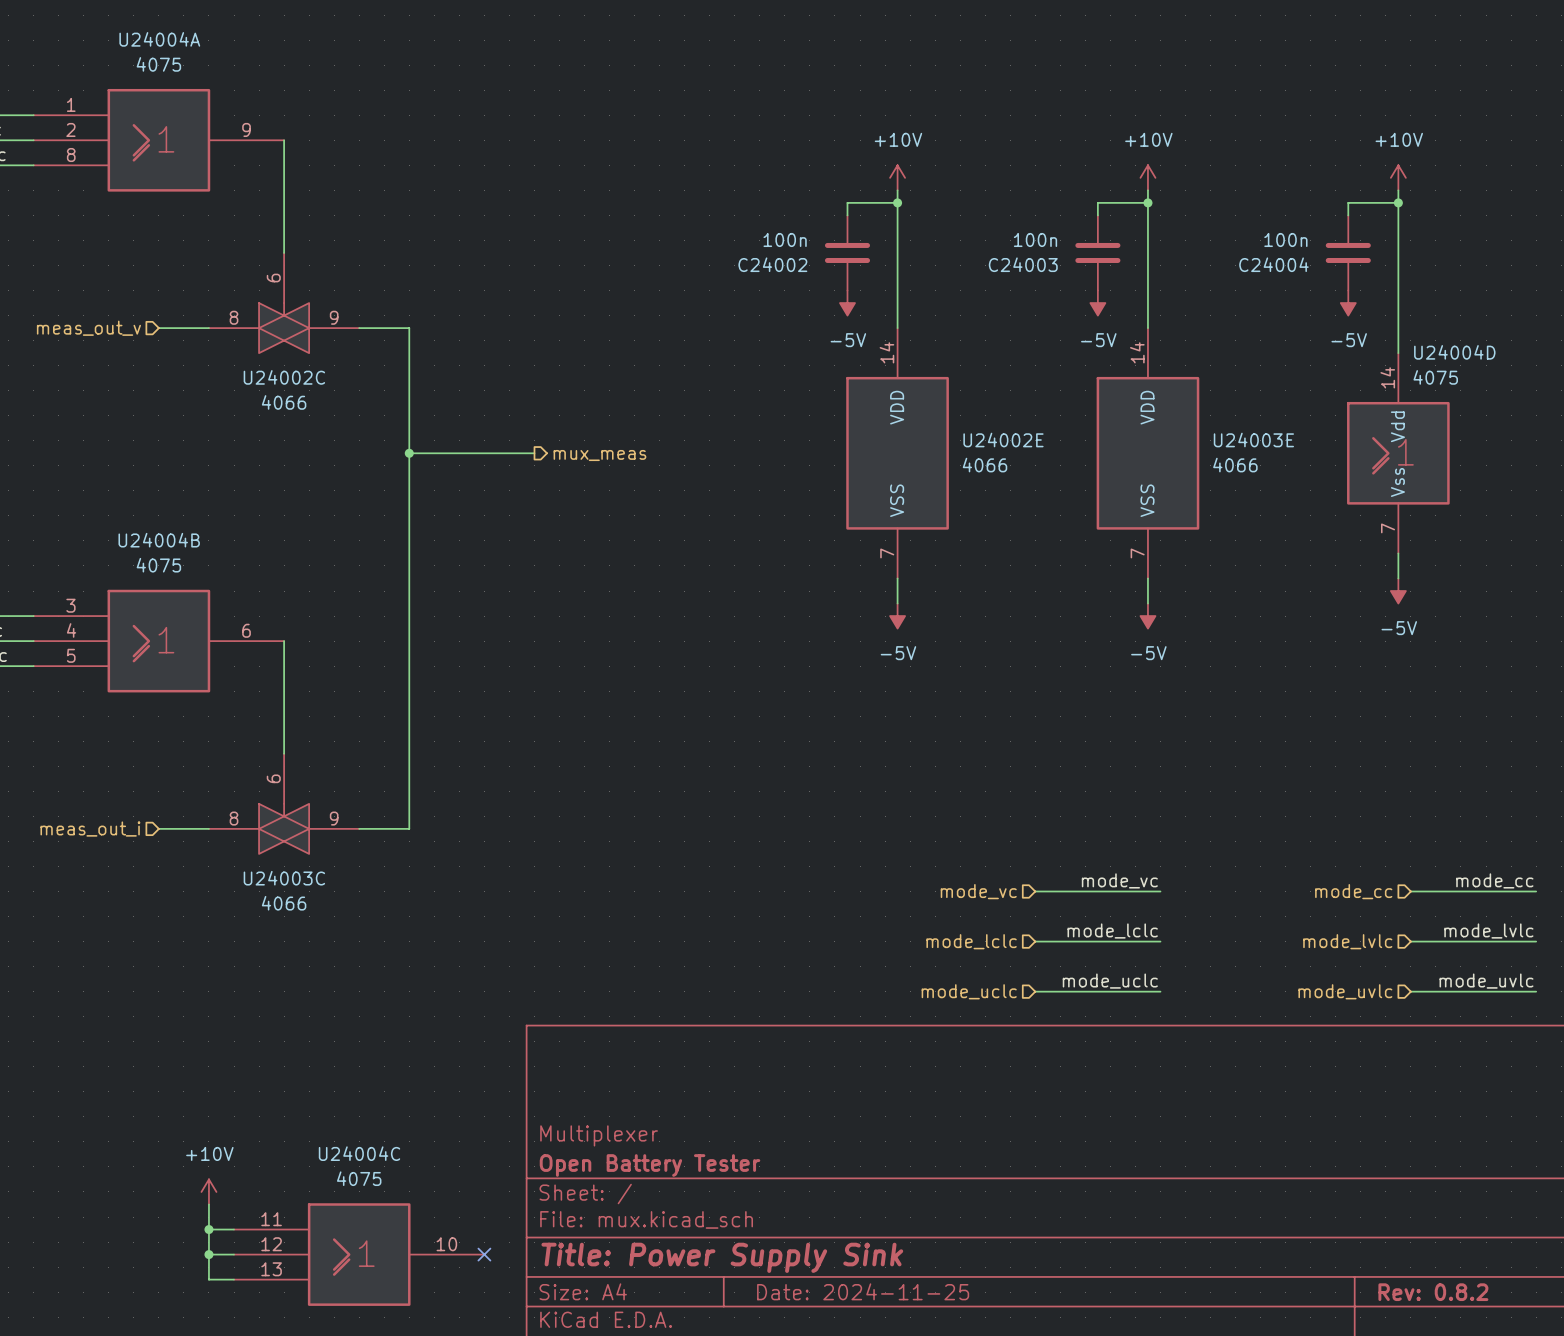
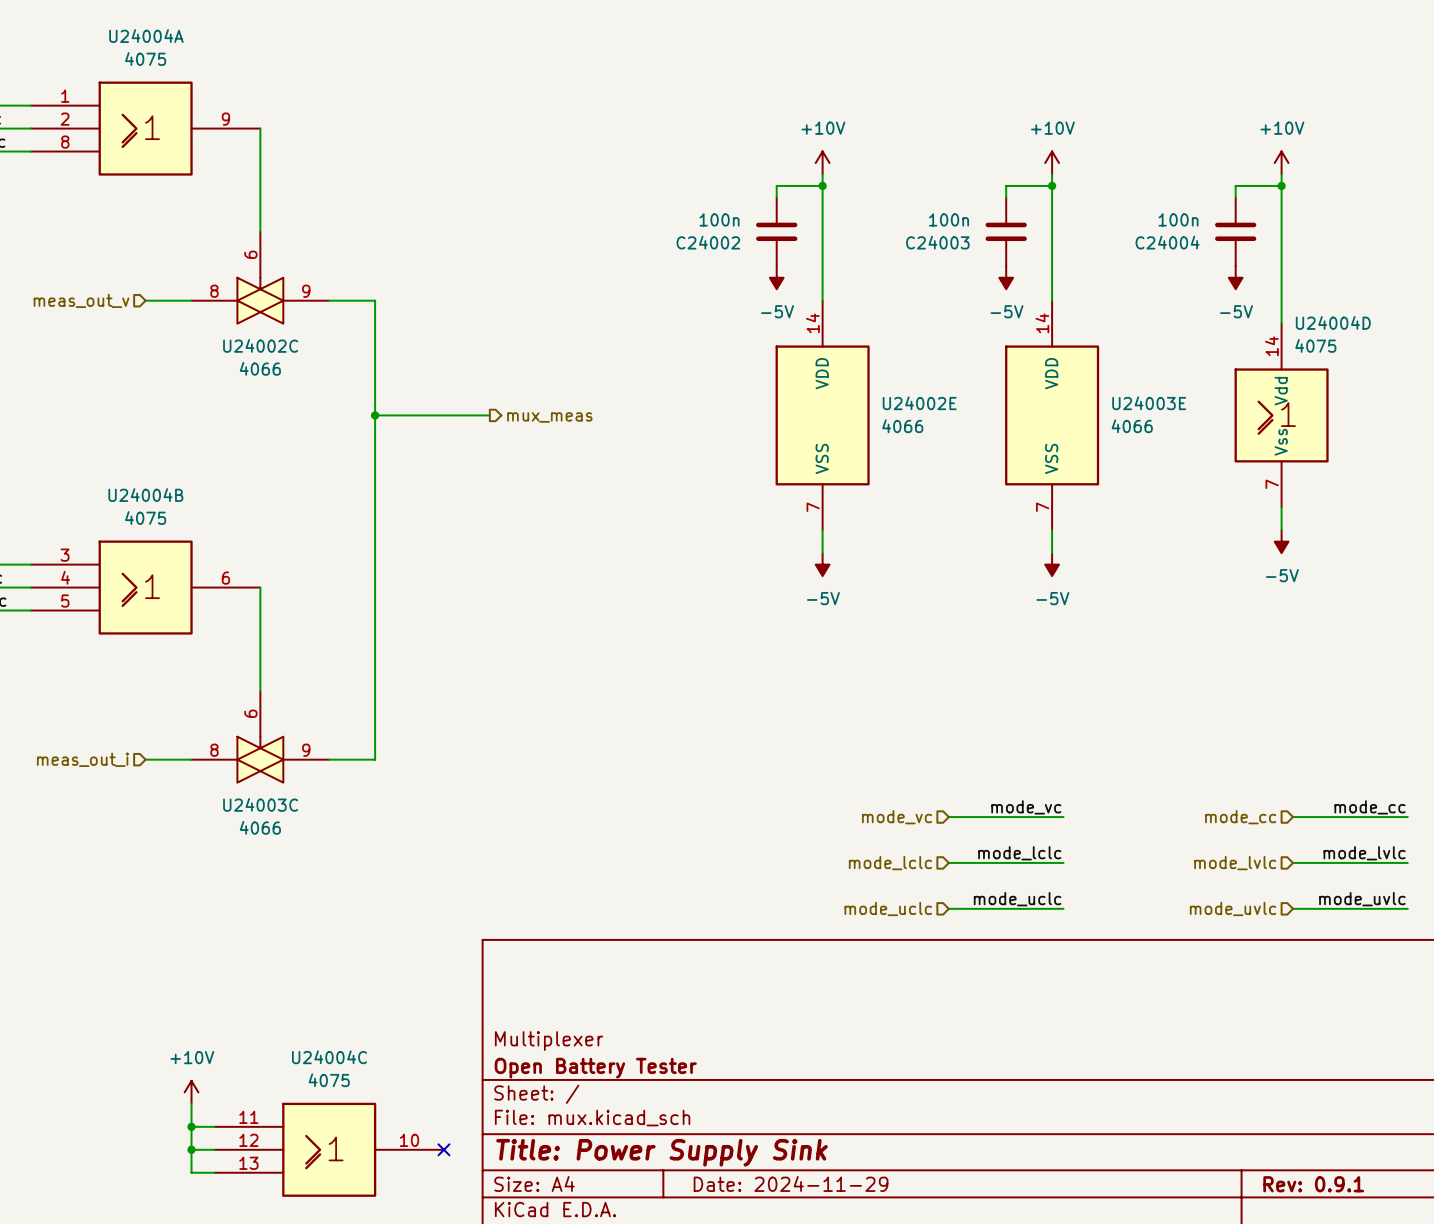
title block: Date: 2024-11-25 (863, 1291) -> Date: 2024-11-29 (791, 1183)
title block: Rev: 0.8.2 (1433, 1292) -> Rev: 0.9.1 (1313, 1184)

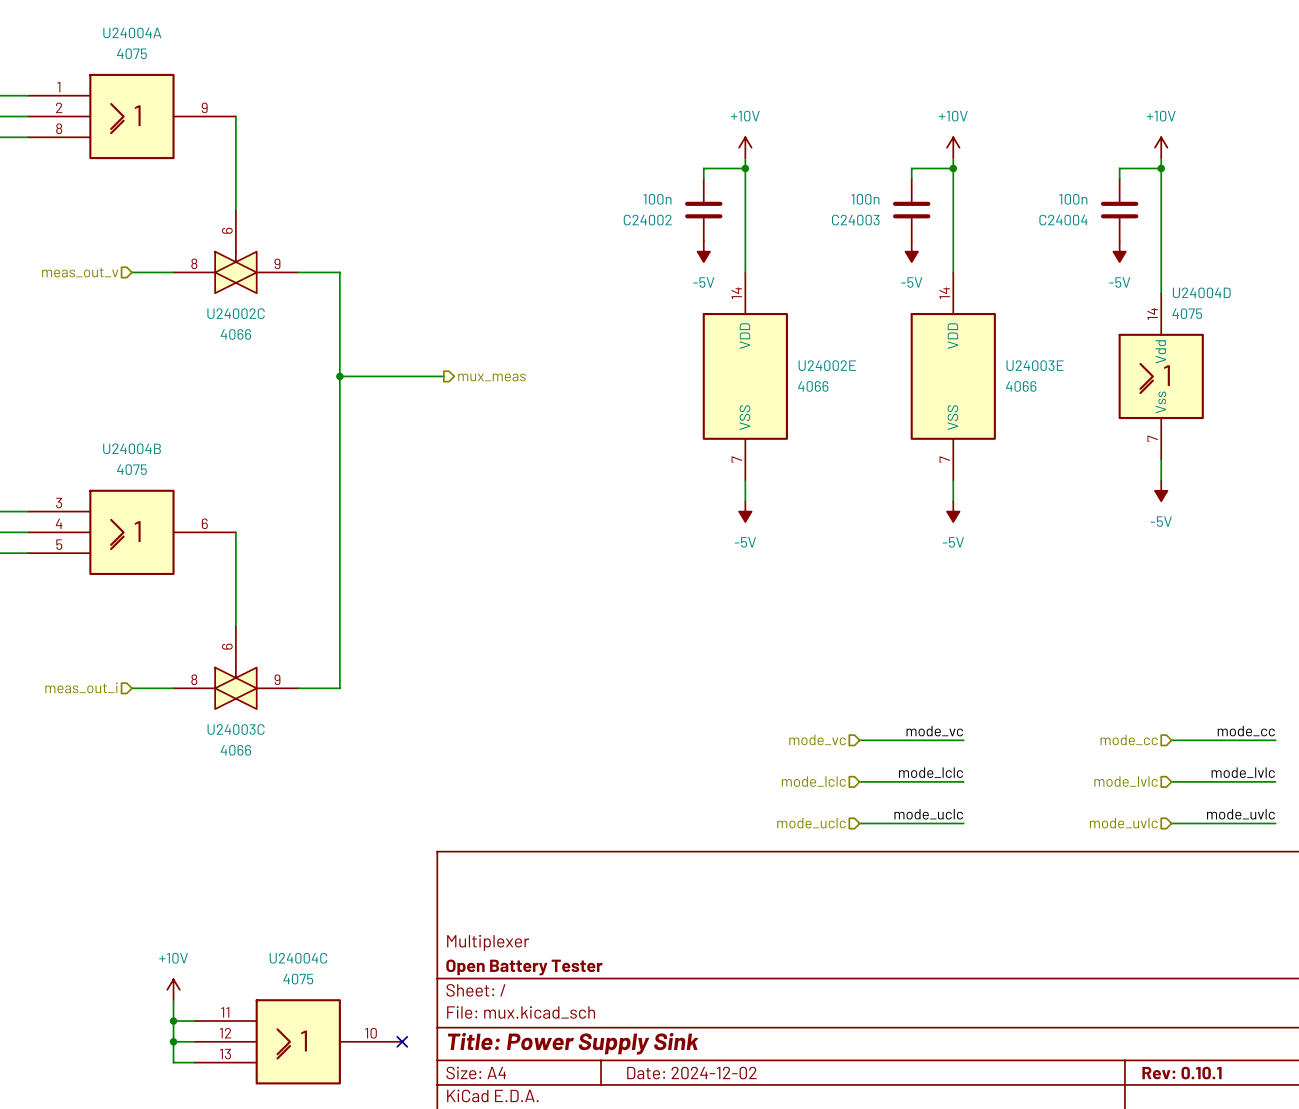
title block: Date: 2024-11-29 (791, 1183) -> Date: 2024-12-02 (691, 1073)
title block: Rev: 0.9.1 (1313, 1184) -> Rev: 0.10.1 (1182, 1073)

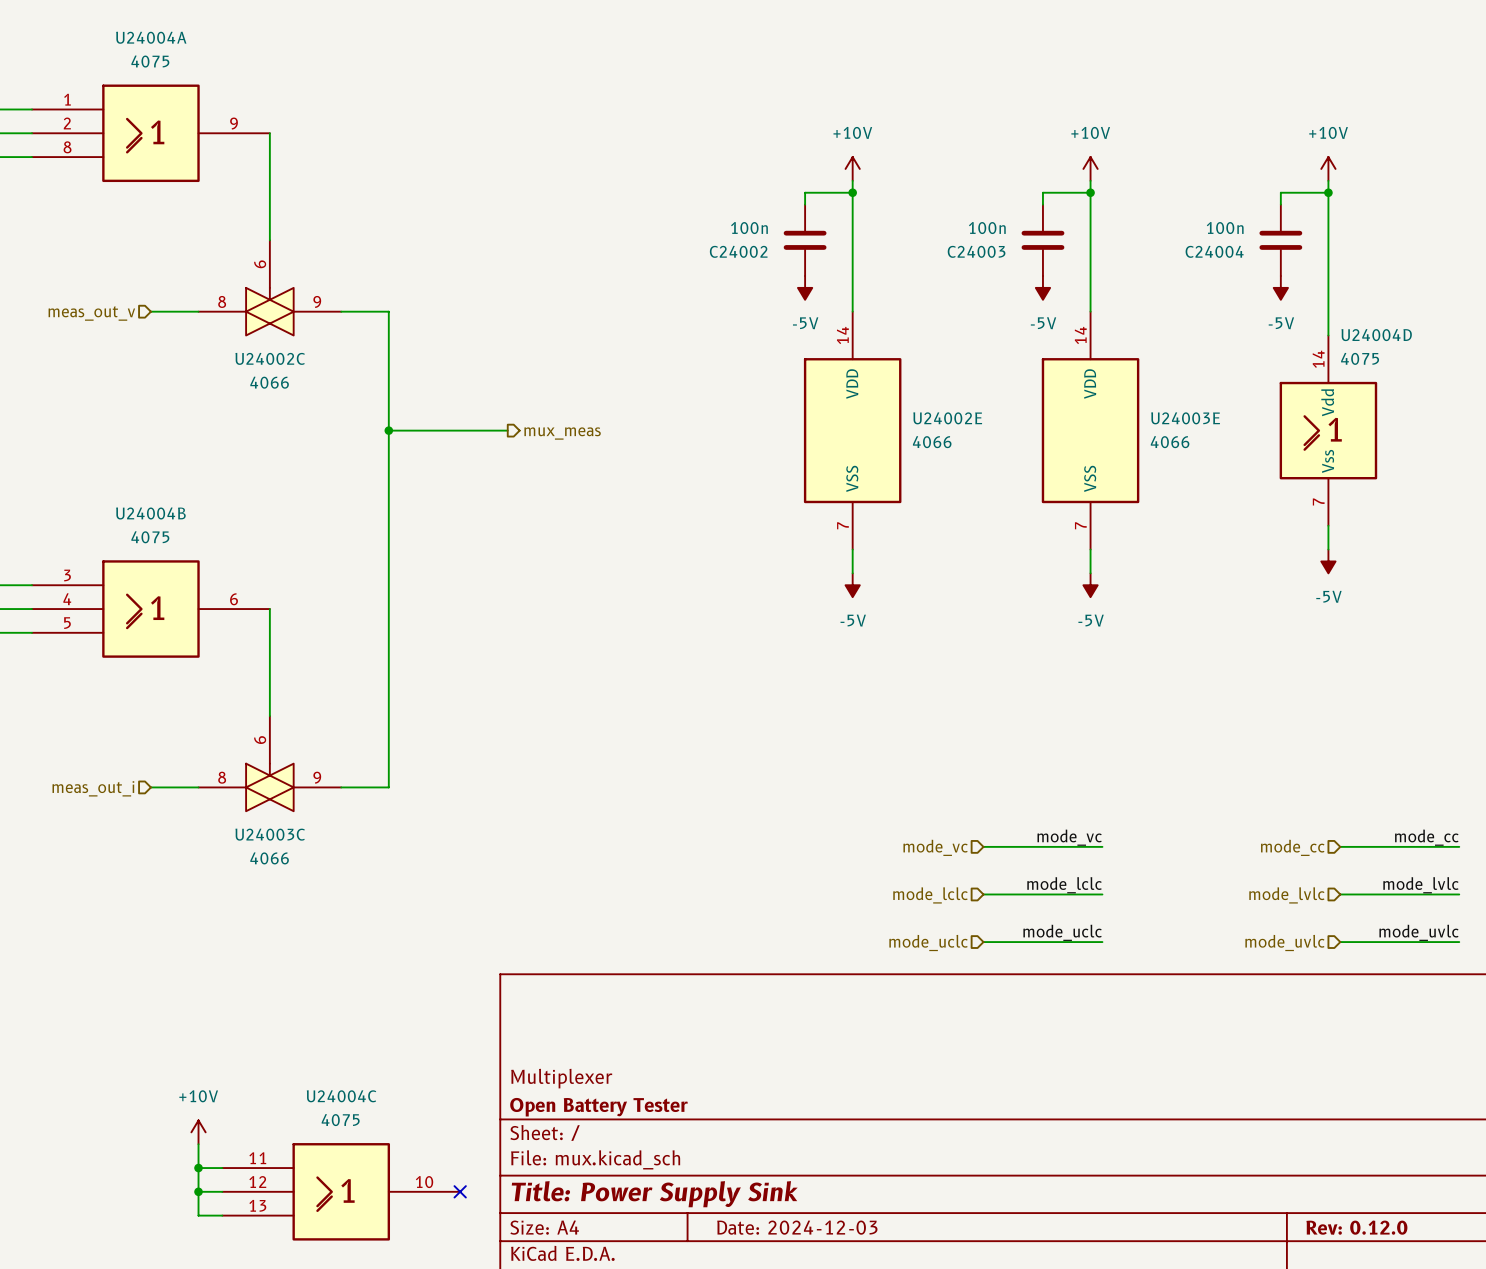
title block: Date: 2024-12-02 (691, 1073) -> Date: 2024-12-03 (797, 1227)
title block: Rev: 0.10.1 (1182, 1073) -> Rev: 0.12.0 (1356, 1227)

